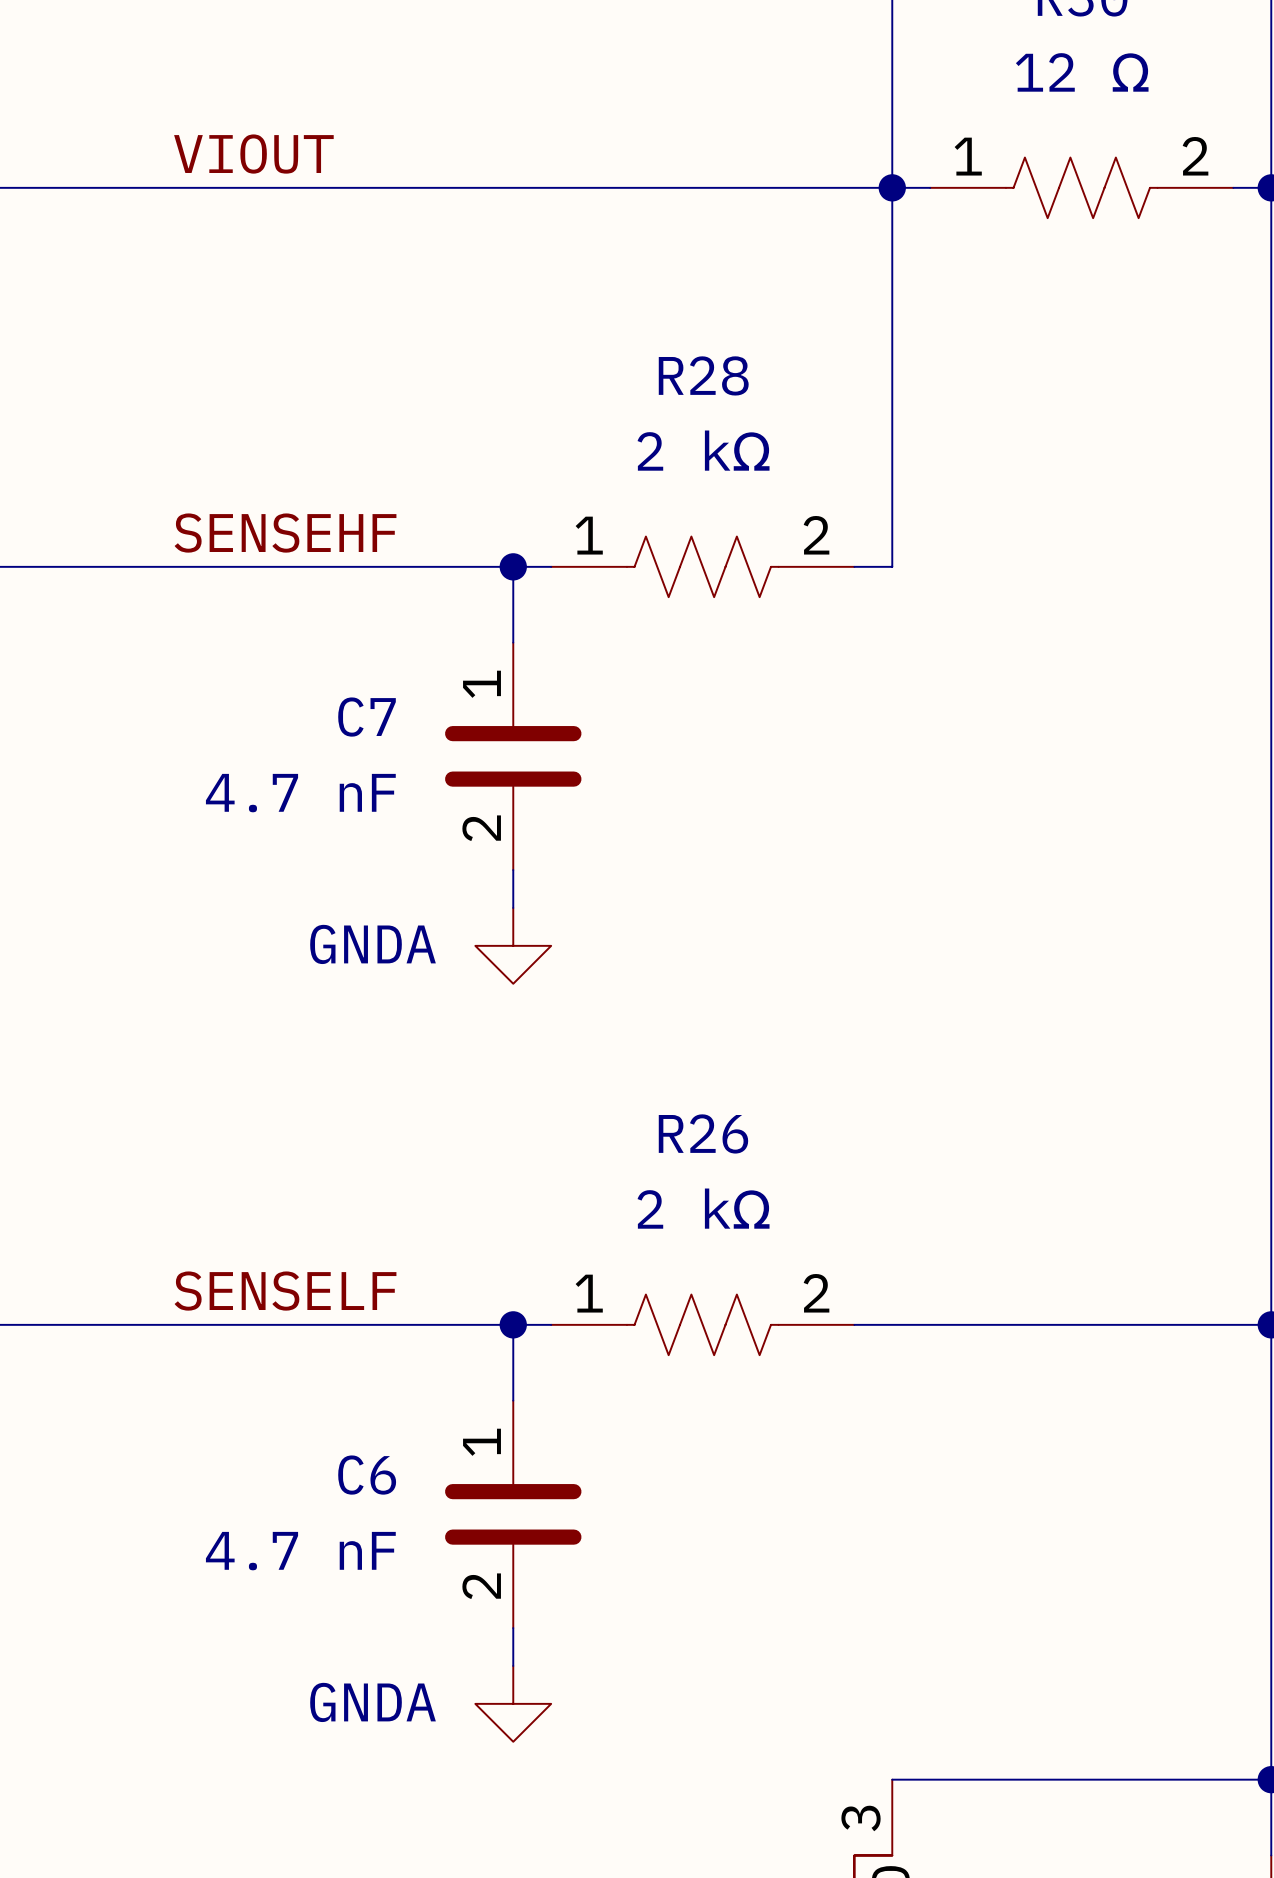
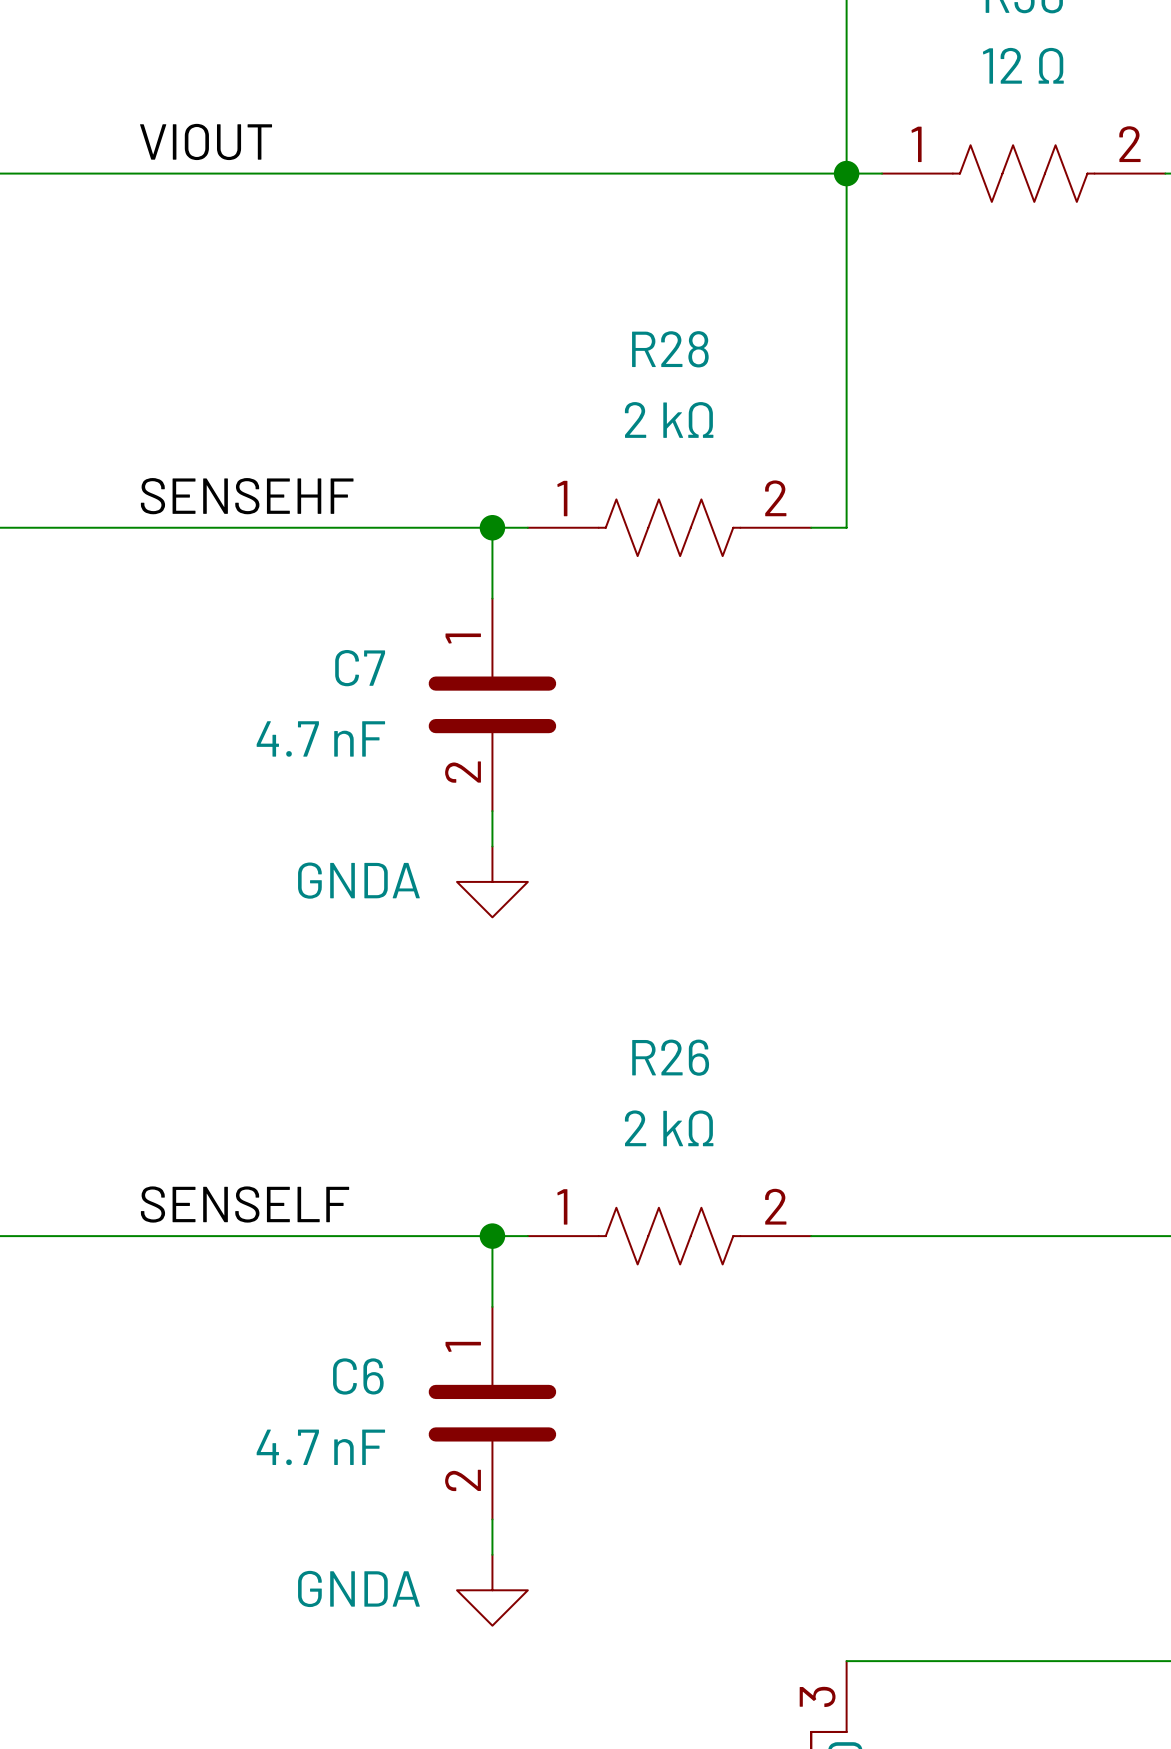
label position: VIOUT (253, 154) -> VIOUT (206, 141)
label position: SENSEHF (285, 533) -> SENSEHF (247, 496)
label position: SENSELF (285, 1291) -> SENSELF (245, 1204)

